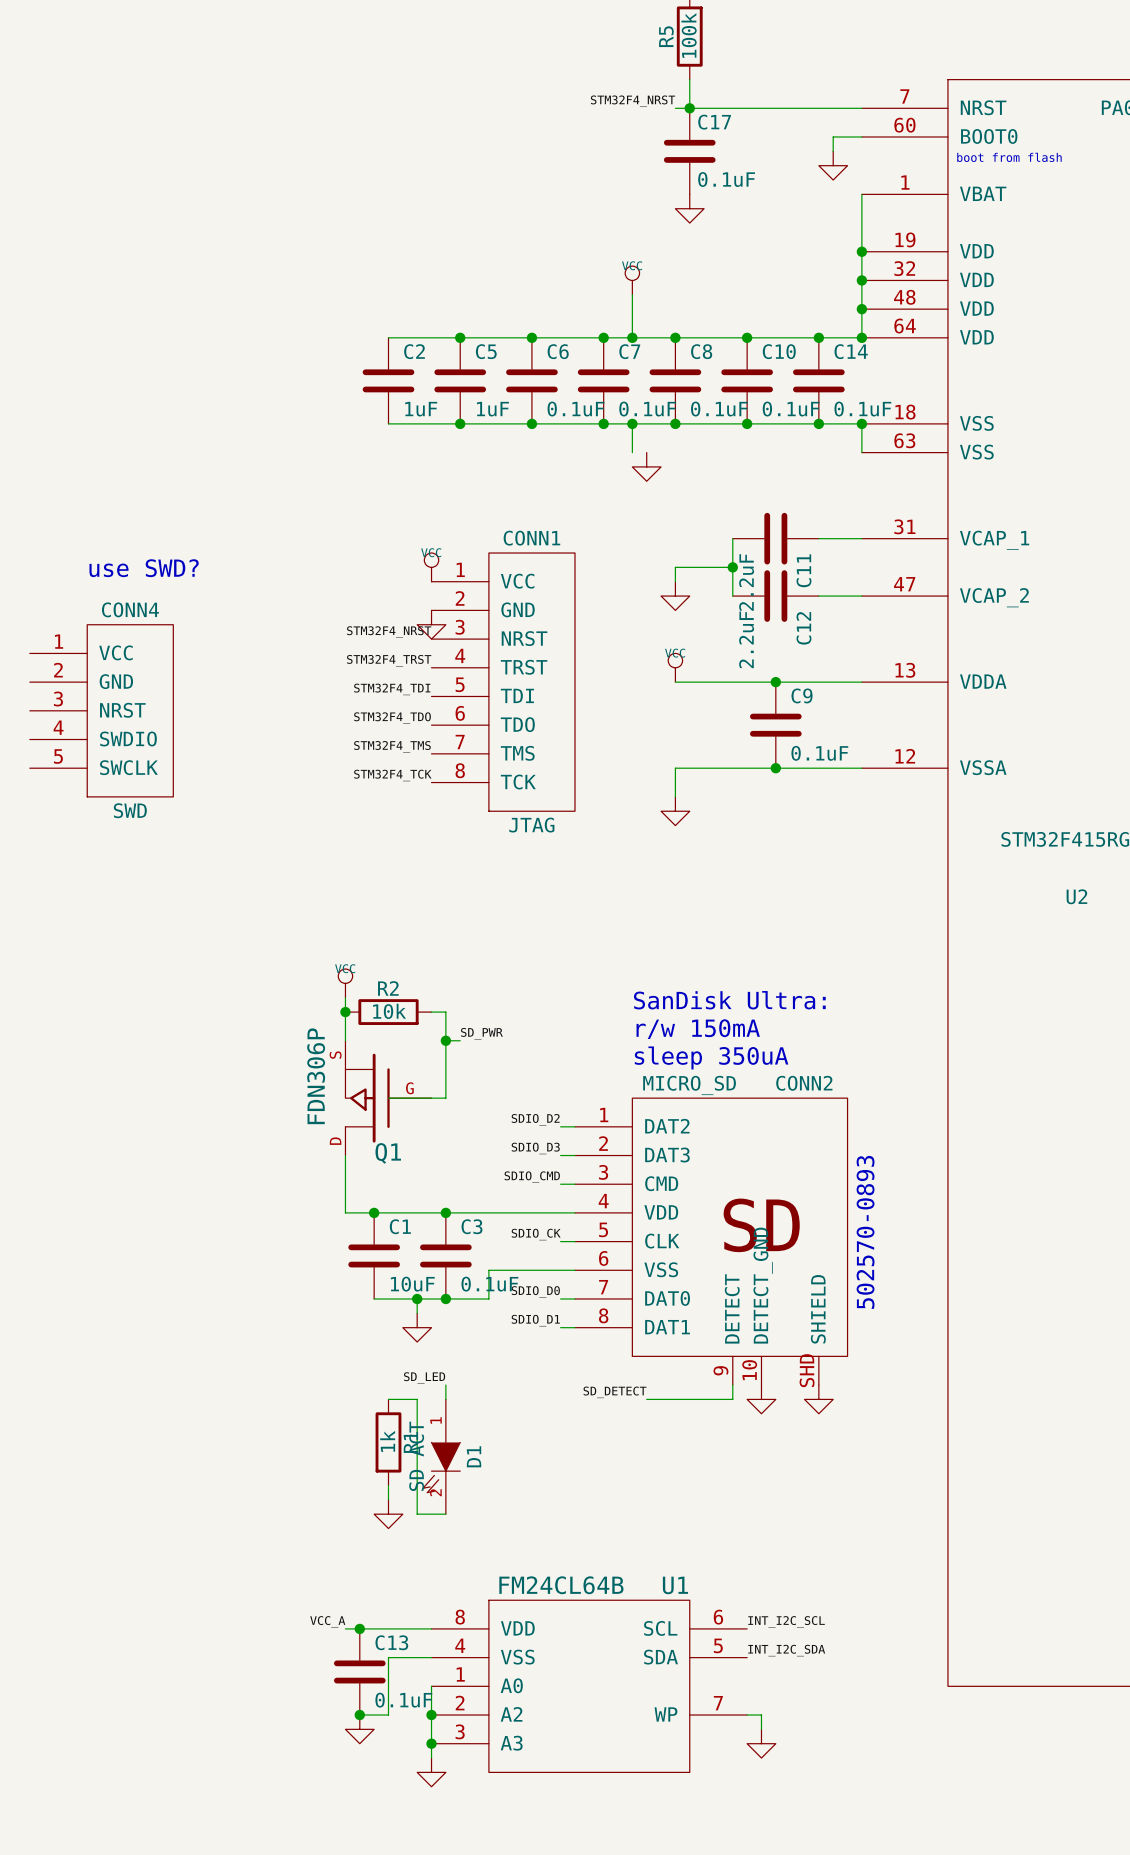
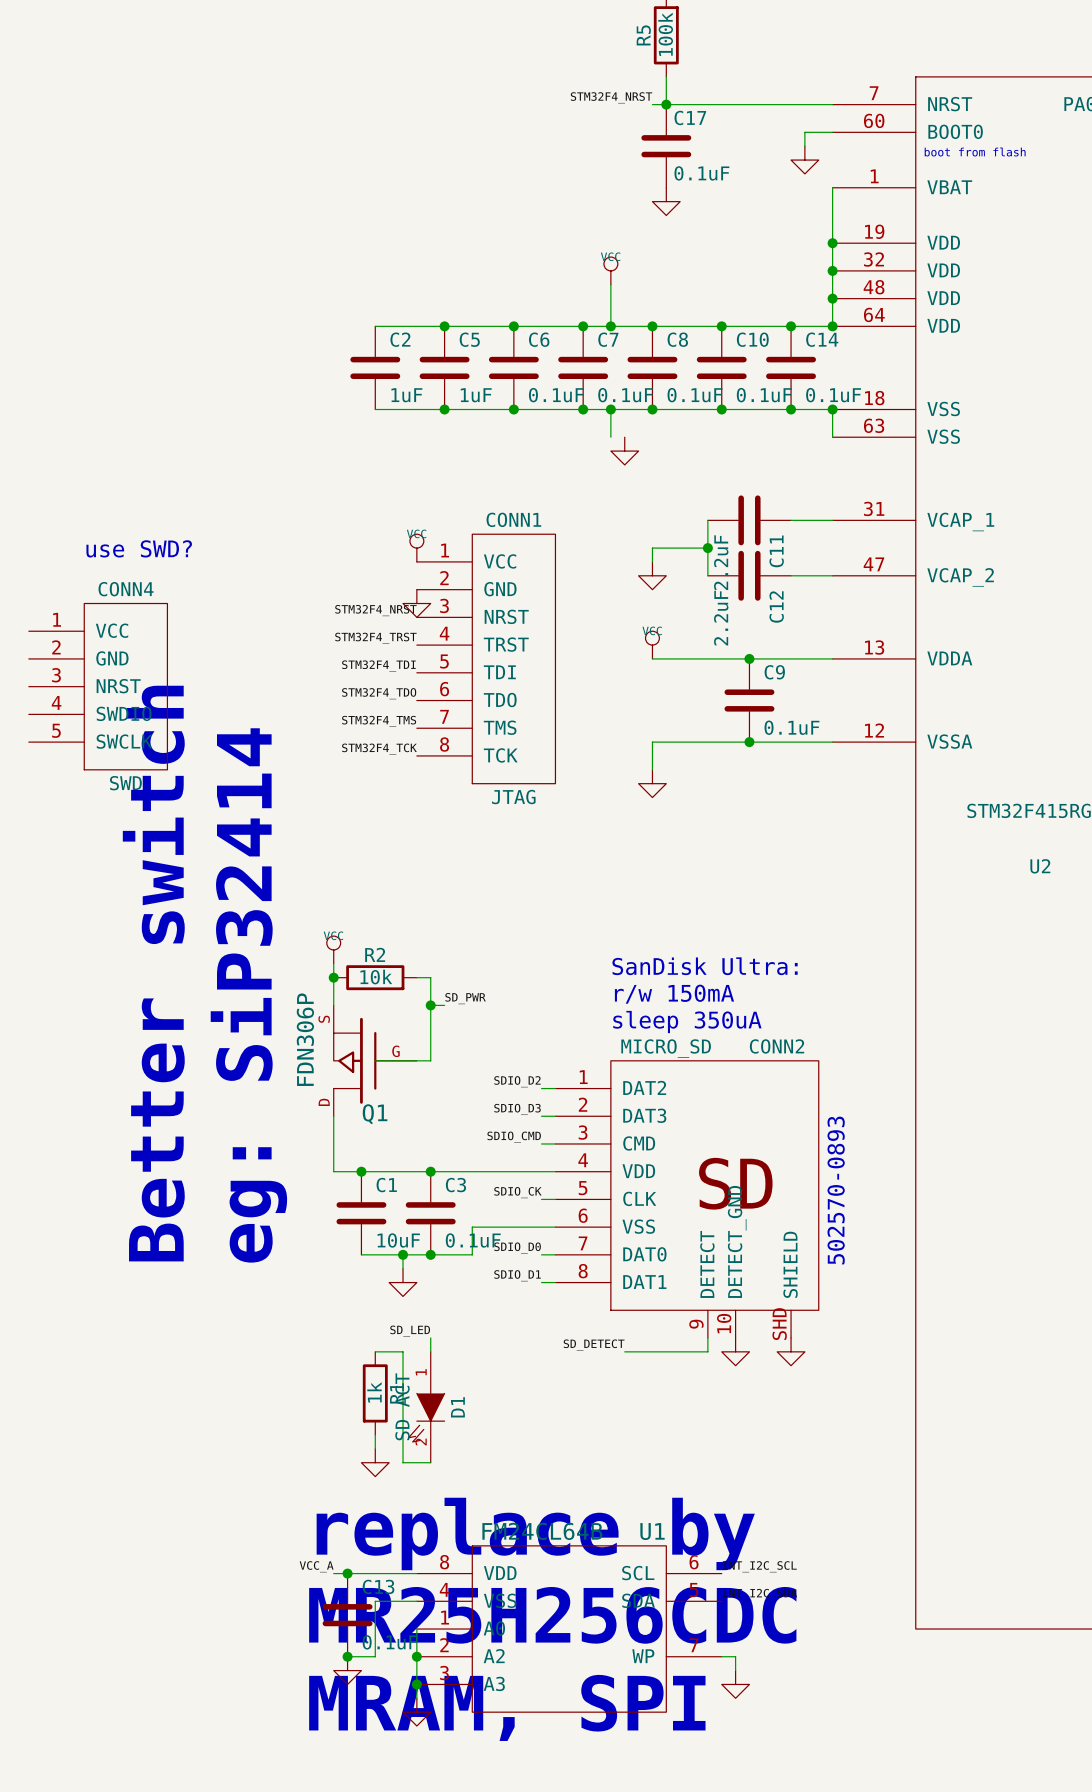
text: none -> Better switch (153, 973)
text: none -> eg: SiP32414 (248, 995)
text: none -> replace by (535, 1533)
text: none -> MR25H256CDC (552, 1615)
text: none -> MRAM, SPI (507, 1707)

